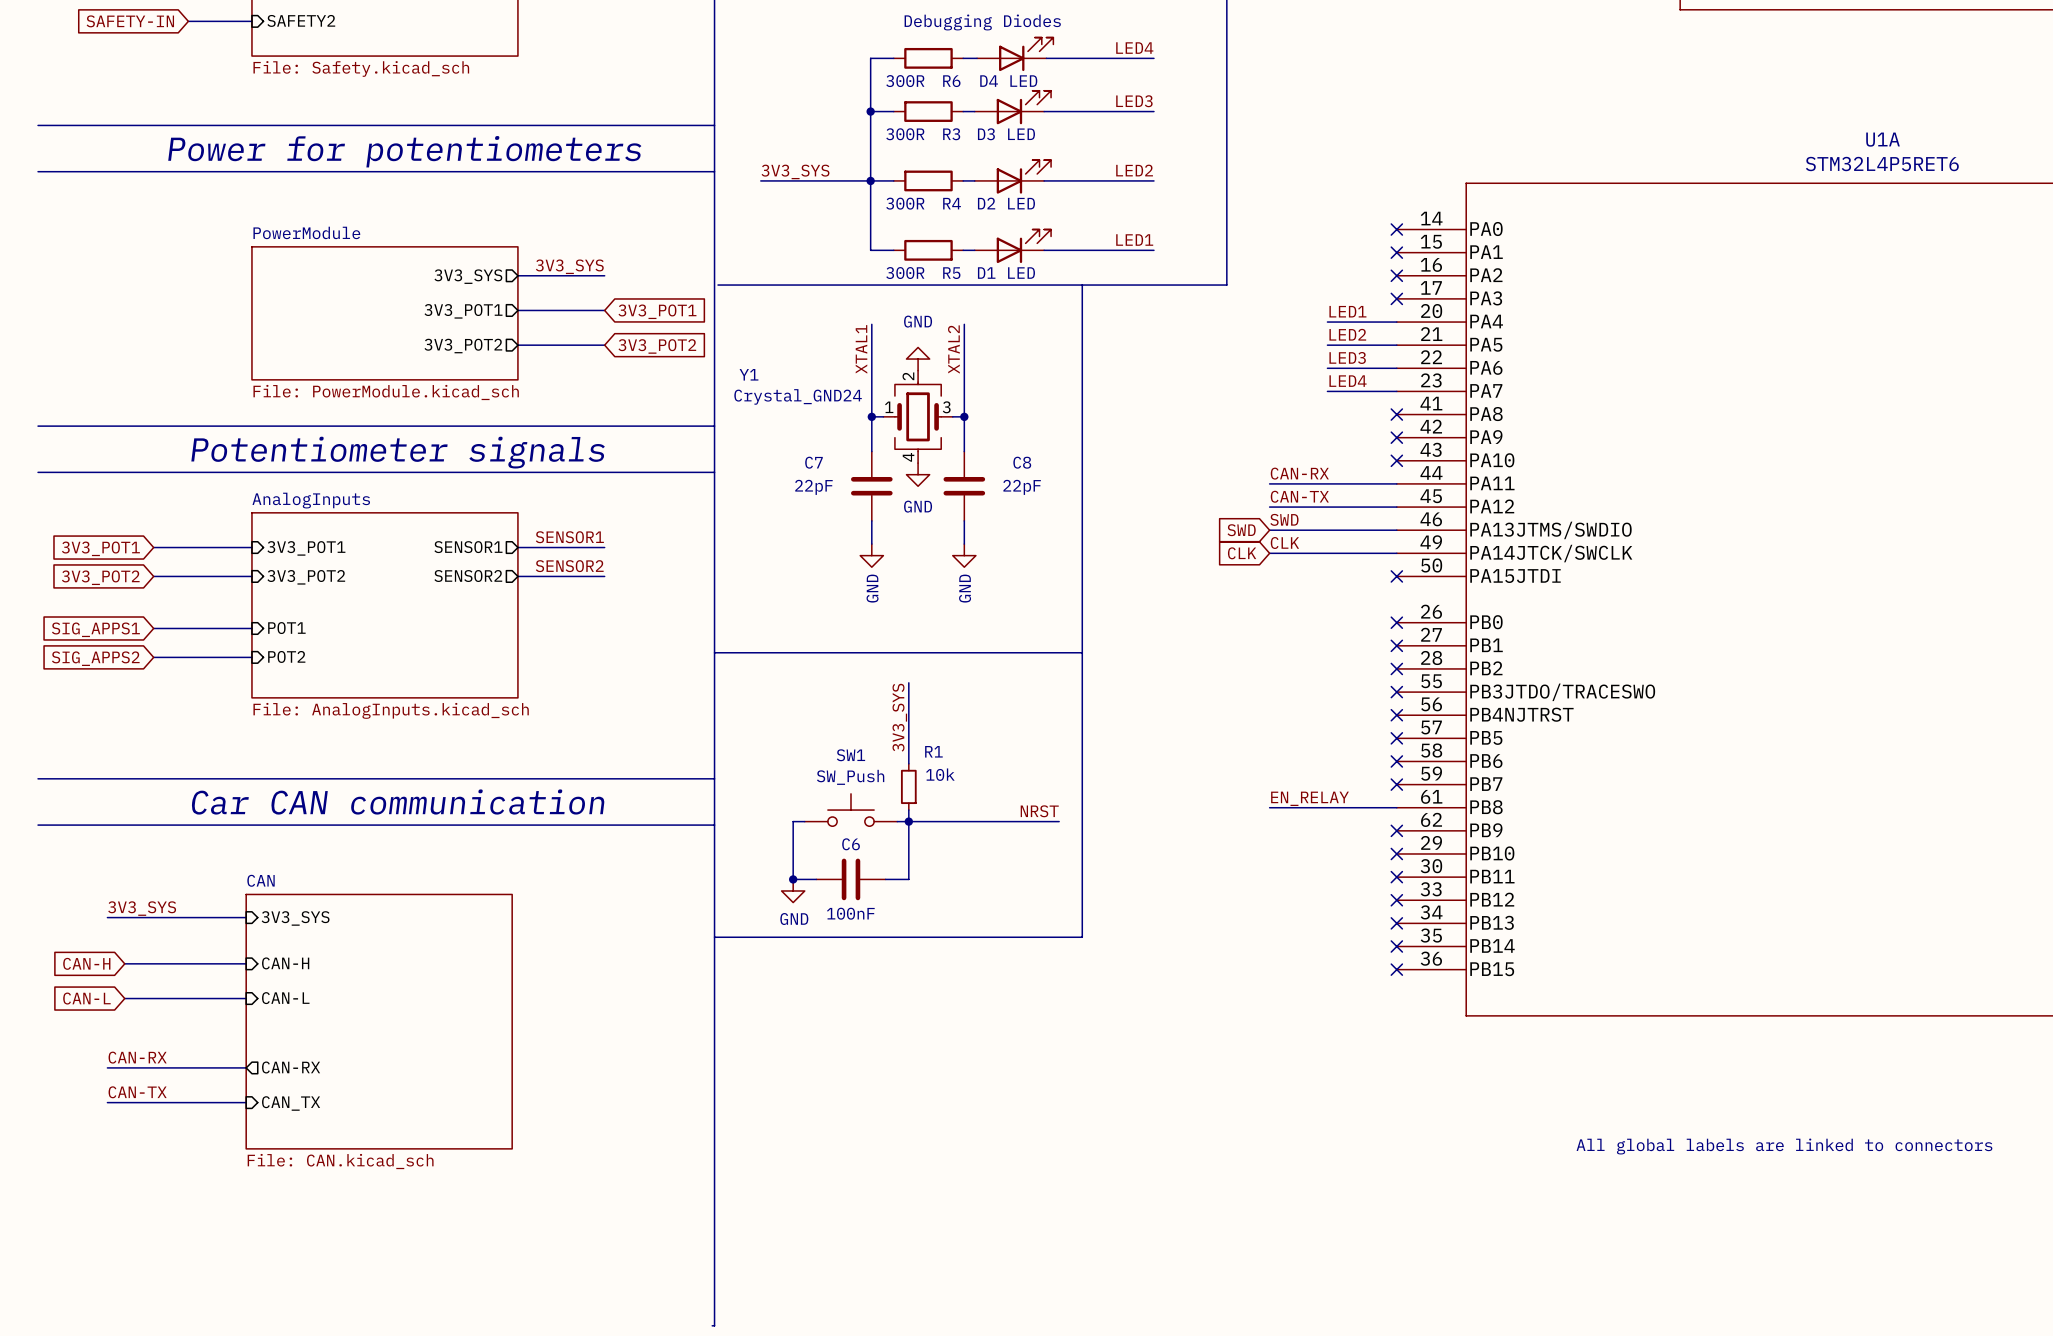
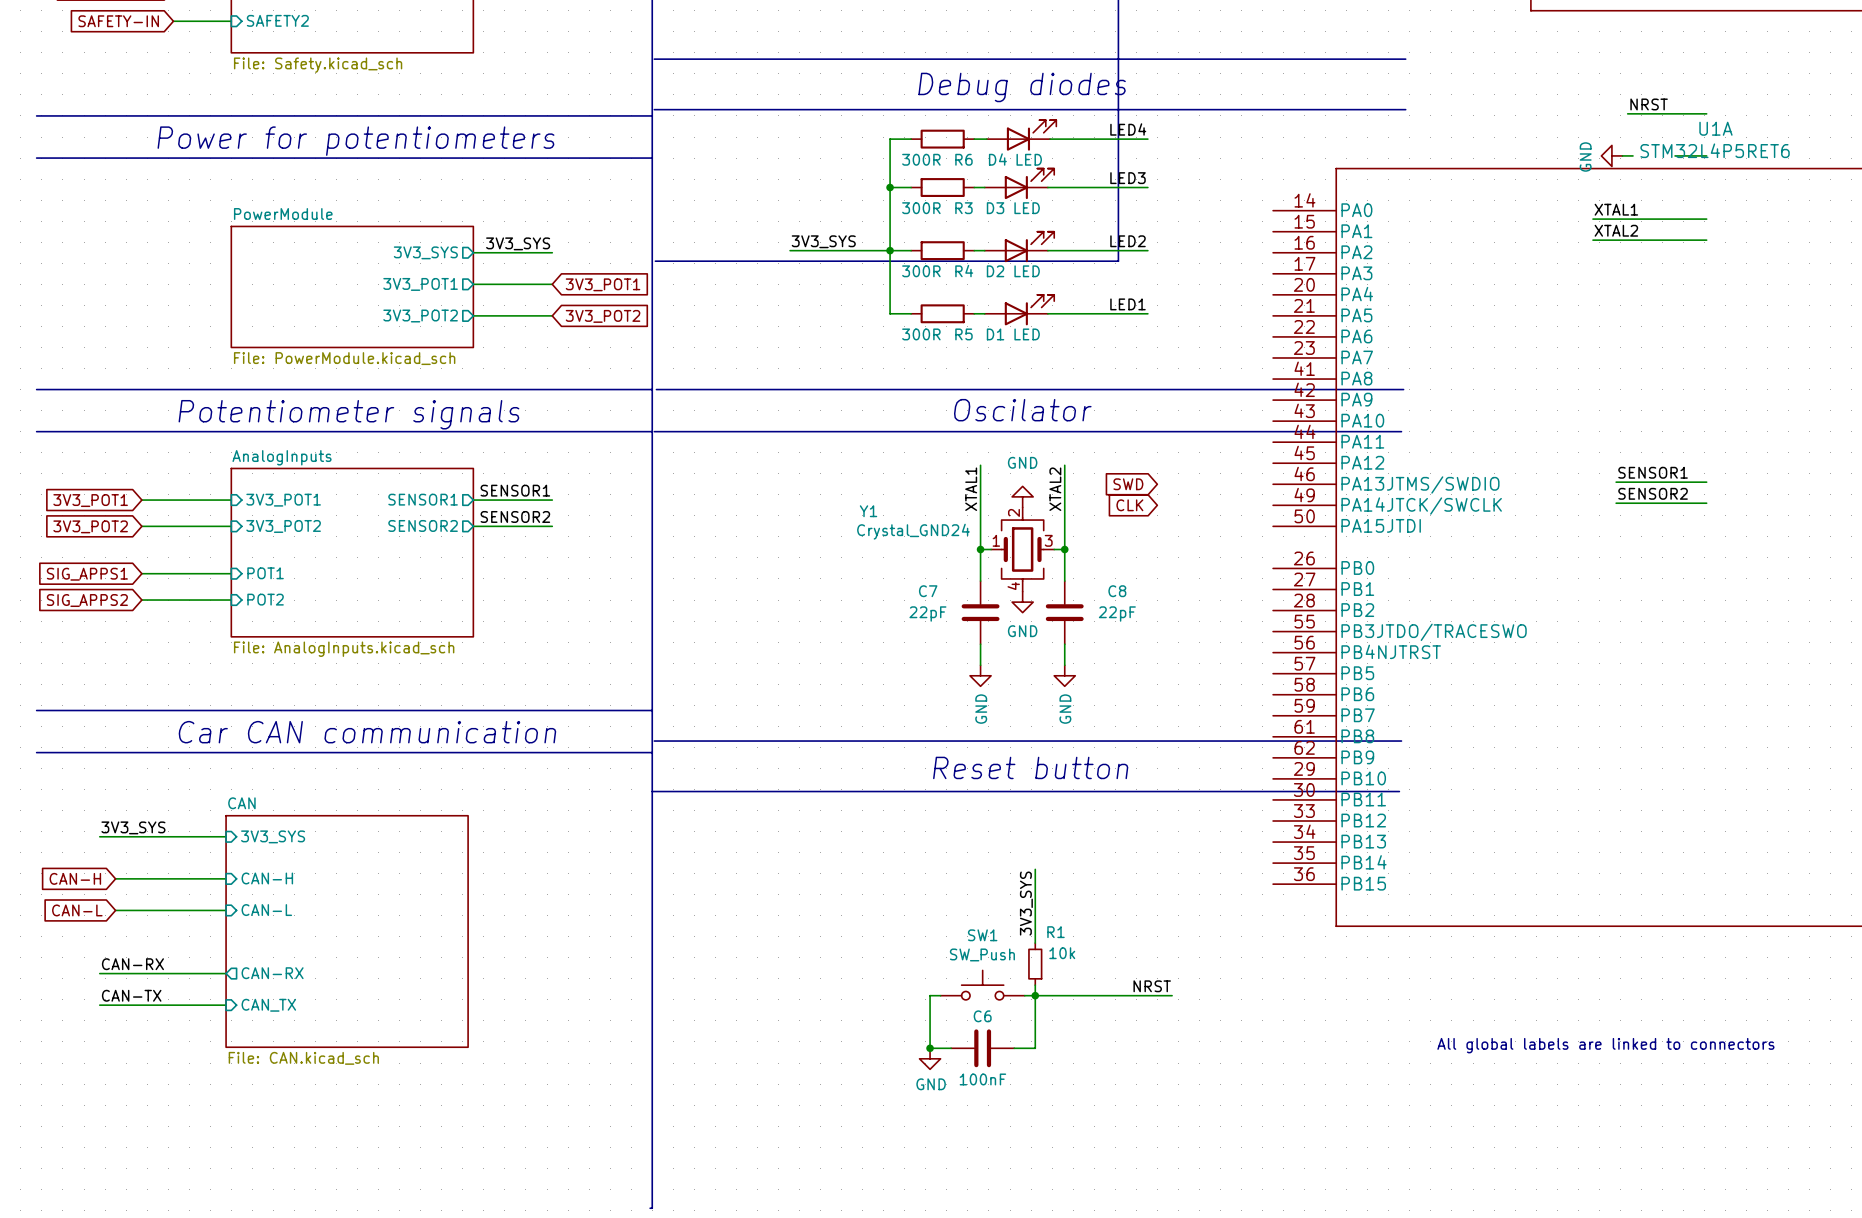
text: Debugging Diodes (982, 22) -> none
label: LED4 (1134, 48) -> none
D4 position: (1015, 54) -> (1021, 135)
wire: (893, 58) (870, 58) (870, 250) (893, 250) -> (911, 139) (890, 139) (890, 313) (911, 313)
R6 position: (928, 58) -> (942, 139)
wire: (963, 58) (977, 58) -> (974, 139) (986, 139)
wire: (1046, 58) (1153, 58) -> (1050, 139) (1147, 139)
line: none -> (654, 59) (1405, 59)
text: none -> Debug diodes (1022, 87)
label: LED3 (1134, 101) -> none
D3 position: (1012, 107) -> (1019, 183)
wire: (870, 111) (893, 111) -> (890, 187) (911, 187)
junction: (870, 111) -> none
R3 position: (928, 111) -> (942, 187)
wire: (963, 111) (974, 111) -> (974, 187) (984, 187)
wire: (1044, 111) (1153, 111) -> (1047, 187) (1147, 187)
label: none -> NRST (1649, 104)
line: none -> (654, 109) (1405, 109)
wire: none -> (1627, 113) (1706, 113)
label: none -> LED4 (1128, 129)
power symbol: none -> GND (1611, 155)
wire: none -> (1622, 155) (1632, 155)
wire: none -> (1675, 155) (1706, 155)
label: LED2 (1134, 170) -> none
label position: 3V3_SYS (795, 171) -> 3V3_SYS (823, 241)
D2 position: (1012, 176) -> (1019, 246)
wire: (760, 180) (893, 180) -> (790, 250) (911, 250)
junction: (870, 180) -> none
R4 position: (928, 180) -> (942, 250)
wire: (963, 180) (974, 180) -> (974, 250) (984, 250)
wire: (1044, 180) (1153, 180) -> (1047, 250) (1147, 250)
label: none -> LED3 (1128, 178)
junction: none -> (890, 187)
label: none -> XTAL1 (1616, 209)
no-connect mark: (1396, 229) -> none
wire: none -> (1592, 219) (1706, 219)
label: LED1 (1134, 240) -> none
D1 position: (1012, 246) -> (1019, 310)
R5 position: (928, 250) -> (942, 313)
wire: (963, 250) (974, 250) -> (974, 313) (984, 313)
wire: (1044, 250) (1153, 250) -> (1047, 313) (1147, 313)
label: none -> XTAL2 (1616, 230)
no-connect mark: (1396, 252) -> none
wire: none -> (1592, 240) (1706, 240)
label: none -> LED2 (1128, 241)
junction: none -> (890, 250)
no-connect mark: (1396, 275) -> none
line: (1082, 285) (1082, 937) (714, 937) -> none
no-connect mark: (1396, 298) -> none
label: LED1 (1347, 311) -> none
wire: (1327, 322) (1396, 322) -> none
wire: (871, 324) (871, 451) -> none
wire: (964, 324) (964, 451) -> (980, 465) (980, 581)
label: none -> LED1 (1128, 304)
label: LED2 (1347, 334) -> none
wire: (1327, 345) (1396, 345) -> none
label: XTAL1 (861, 349) -> none
label: XTAL2 (953, 349) -> none
label: LED3 (1347, 357) -> none
power symbol: GND (918, 359) -> none
wire: (1327, 368) (1396, 368) -> none
label: LED4 (1348, 381) -> none
wire: (1327, 391) (1396, 391) -> none
no-connect mark: (1396, 414) -> none
wire: (871, 416) (883, 416) -> none
junction: (871, 416) -> none
Y1 position: (918, 416) -> (1022, 549)
wire: (952, 416) (964, 416) -> (980, 549) (991, 549)
junction: (964, 416) -> none
line: none -> (656, 389) (1403, 389)
no-connect mark: (1396, 437) -> none
text: none -> Oscilator (1022, 410)
no-connect mark: (1396, 460) -> none
line: none -> (654, 431) (1401, 431)
label: CAN-RX (1299, 473) -> none
power symbol: GND (918, 474) -> none
wire: (1269, 483) (1396, 483) -> none
C7 position: (871, 486) -> (980, 612)
C8 position: (964, 486) -> (1064, 612)
label: CAN-TX (1299, 496) -> none
wire: (1269, 507) (1396, 507) -> none
wire: none -> (1064, 465) (1064, 581)
label: none -> SENSOR1 (1653, 472)
label: SWD (1284, 519) -> none
wire: (871, 520) (871, 544) -> none
wire: (964, 520) (964, 544) -> (980, 644) (980, 665)
wire: none -> (1616, 482) (1706, 482)
wire: (1269, 530) (1396, 530) -> none
label: none -> XTAL1 (971, 489)
label: none -> XTAL2 (1055, 489)
label: none -> SENSOR2 (1653, 493)
label: CLK (1284, 543) -> none
power symbol: none -> GND (1022, 496)
wire: none -> (1616, 503) (1706, 503)
wire: (1269, 553) (1396, 553) -> none
power symbol: GND (871, 555) -> none
power symbol: GND (964, 555) -> none
no-connect mark: (1396, 576) -> none
junction: none -> (980, 549)
wire: none -> (1054, 549) (1064, 549)
junction: none -> (1064, 549)
no-connect mark: (1396, 622) -> none
no-connect mark: (1396, 645) -> none
line: (714, 652) (1082, 652) -> none
power symbol: none -> GND (1022, 602)
no-connect mark: (1396, 668) -> none
wire: (908, 682) (908, 763) -> none
no-connect mark: (1396, 692) -> none
wire: none -> (1064, 644) (1064, 665)
no-connect mark: (1396, 715) -> none
label: 3V3_SYS (899, 717) -> none
no-connect mark: (1396, 738) -> none
power symbol: none -> GND (980, 675)
power symbol: none -> GND (1064, 675)
no-connect mark: (1396, 761) -> none
no-connect mark: (1396, 784) -> none
R1 position: (908, 786) -> (1035, 964)
label: EN_RELAY (1309, 798) -> none
wire: (1269, 807) (1396, 807) -> none
SW1 position: (850, 810) -> (982, 985)
wire: (908, 810) (908, 879) (885, 879) -> none
label: NRST (1039, 811) -> none
line: none -> (654, 741) (1401, 741)
wire: (804, 821) (793, 821) (793, 879) (816, 879) -> none
wire: (897, 821) (1059, 821) -> none
junction: (908, 821) -> none
no-connect mark: (1396, 830) -> none
text: none -> Reset button (1030, 767)
no-connect mark: (1396, 853) -> none
line: none -> (652, 791) (1399, 791)
no-connect mark: (1396, 877) -> none
junction: (793, 879) -> none
C6 position: (850, 879) -> (982, 1048)
power symbol: GND (793, 890) -> none
no-connect mark: (1396, 900) -> none
no-connect mark: (1396, 923) -> none
no-connect mark: (1396, 946) -> none
wire: none -> (1035, 869) (1035, 943)
no-connect mark: (1396, 969) -> none
label: none -> 3V3_SYS (1026, 903)
wire: none -> (1035, 985) (1035, 1048) (1014, 1048)
label: none -> NRST (1152, 986)
wire: none -> (940, 995) (930, 995) (930, 1048) (951, 1048)
wire: none -> (1024, 995) (1172, 995)
junction: none -> (1035, 995)
junction: none -> (930, 1048)
power symbol: none -> GND (930, 1058)

